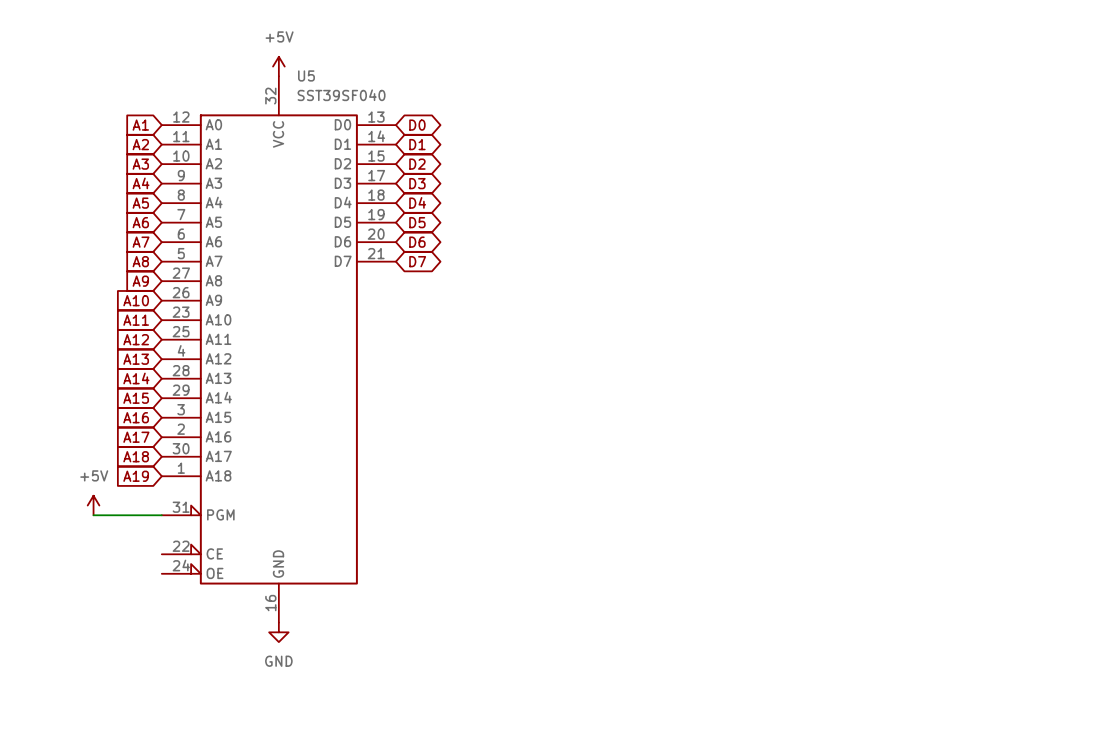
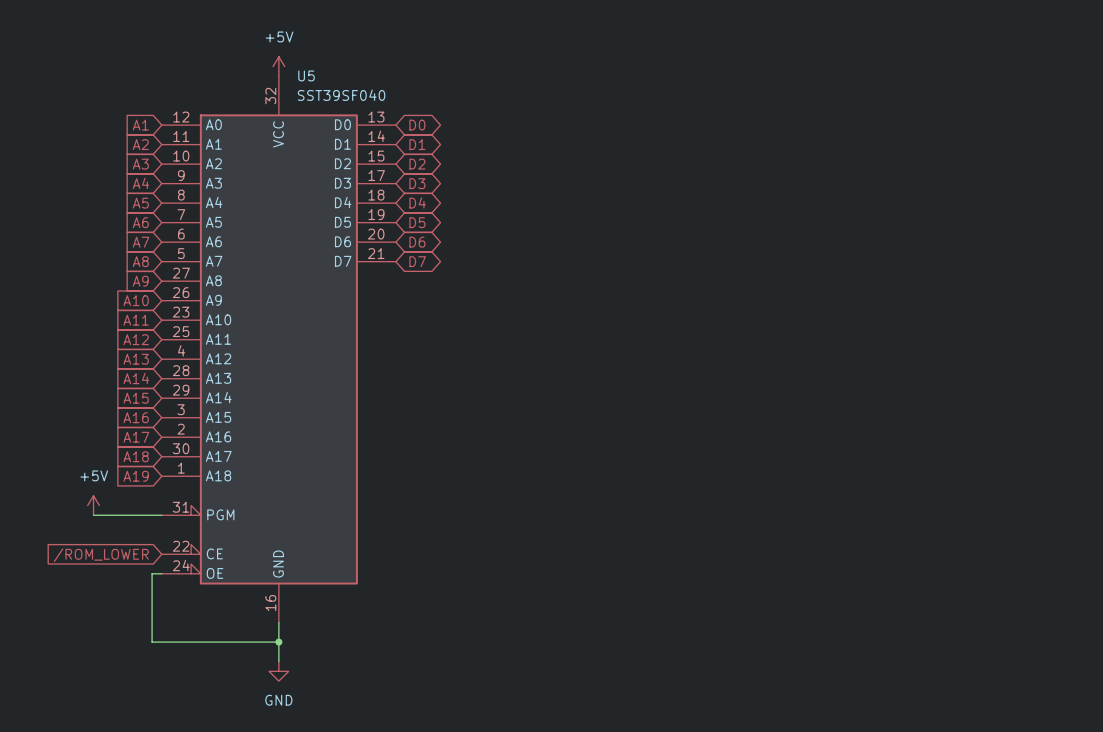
global label: none -> /ROM_LOWER (101, 555)
wire: none -> (161, 573) (152, 573) (152, 642) (278, 642)
wire: none -> (278, 622) (278, 661)
power symbol position: GND (278, 632) -> GND (278, 671)
junction: none -> (278, 642)

